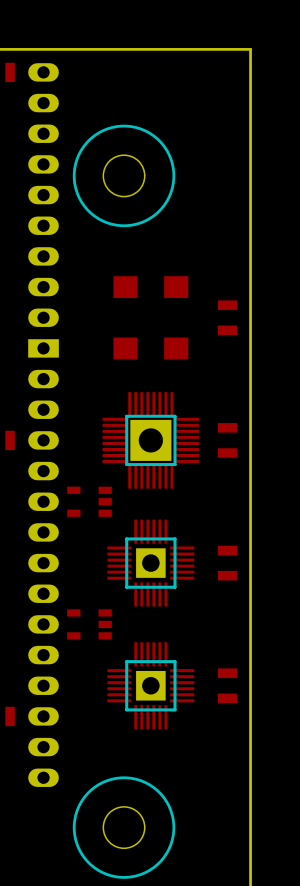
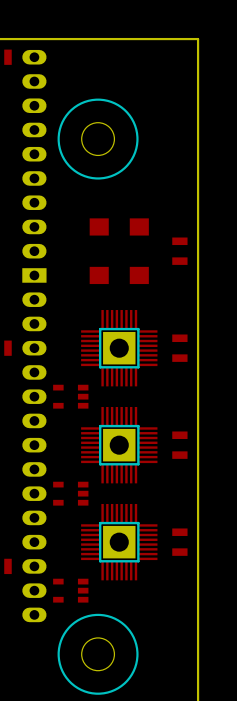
part footprint: [107, 519, 195, 607] -> [81, 406, 158, 484]
part footprint: [107, 642, 195, 730] -> [81, 503, 158, 581]
part: none -> (70, 590)

